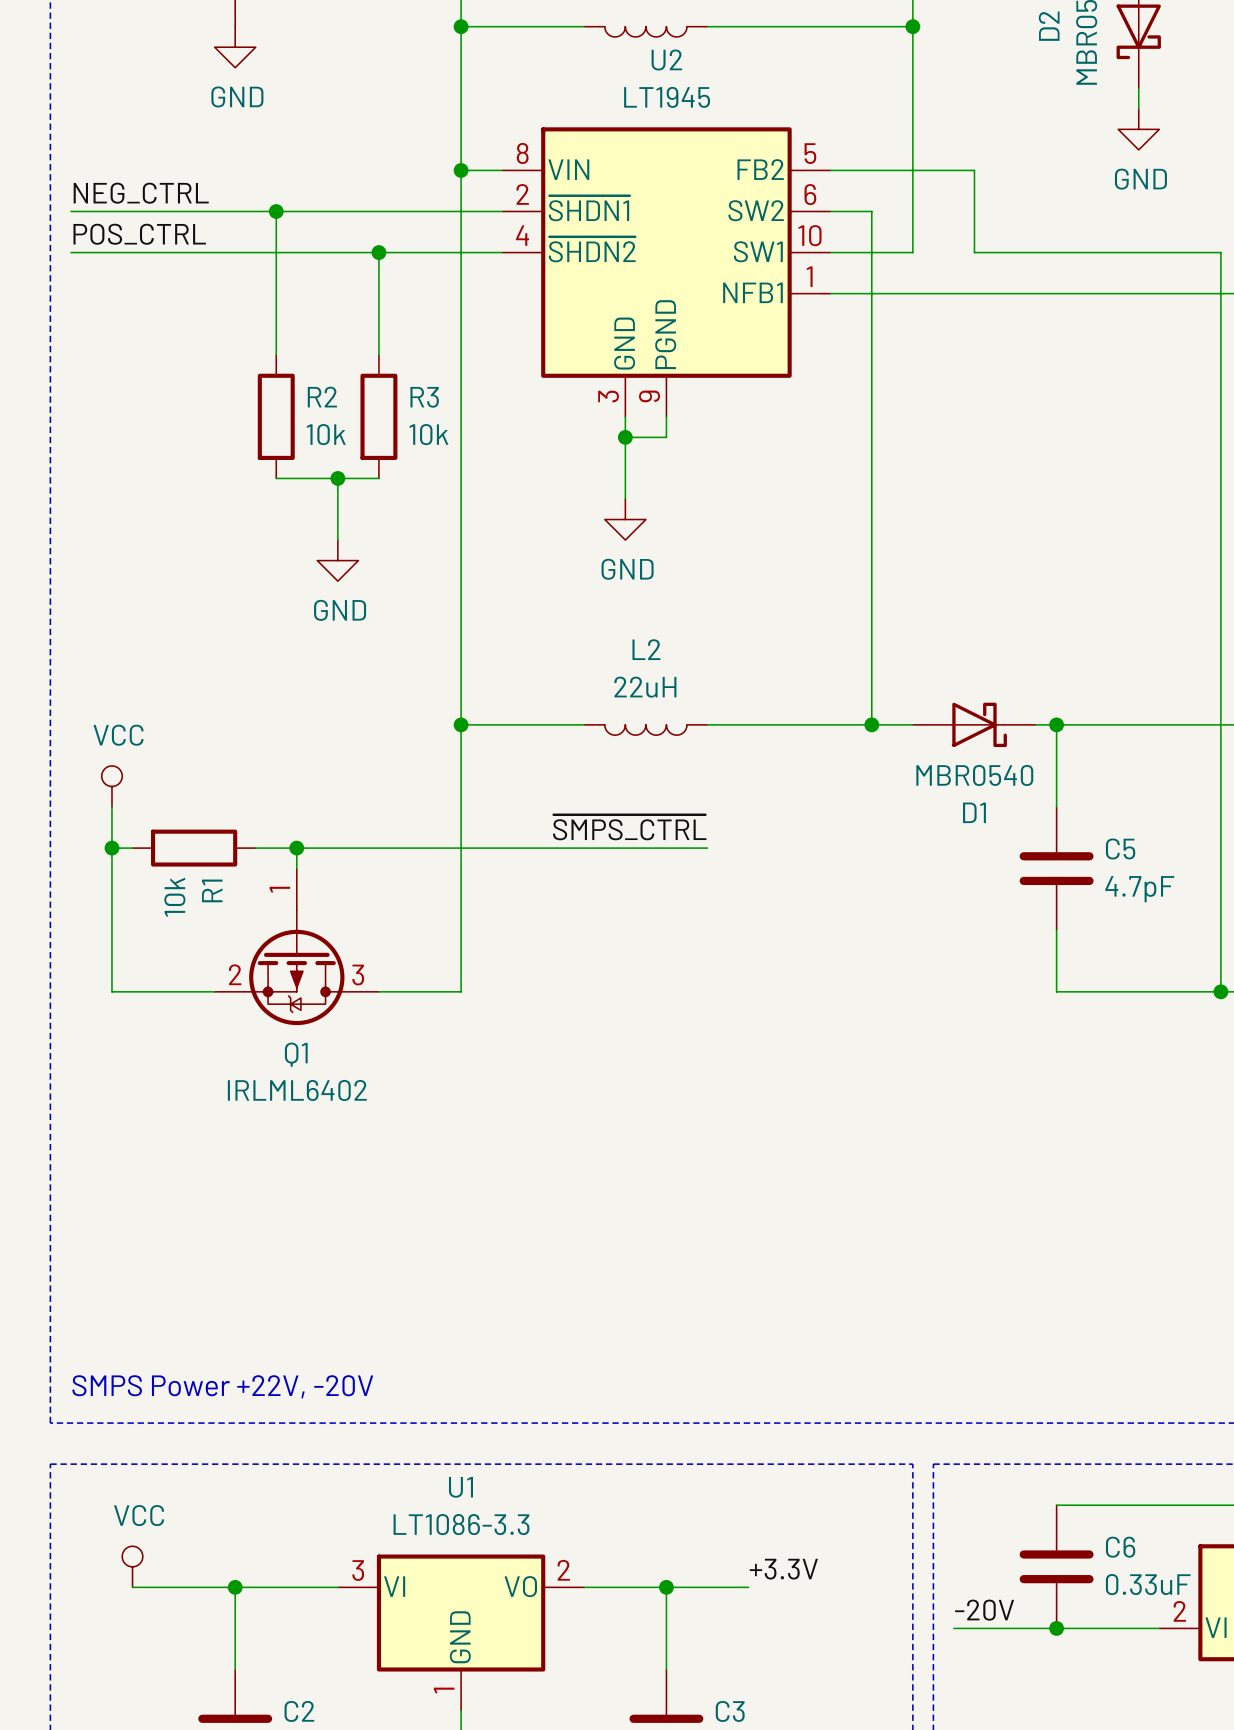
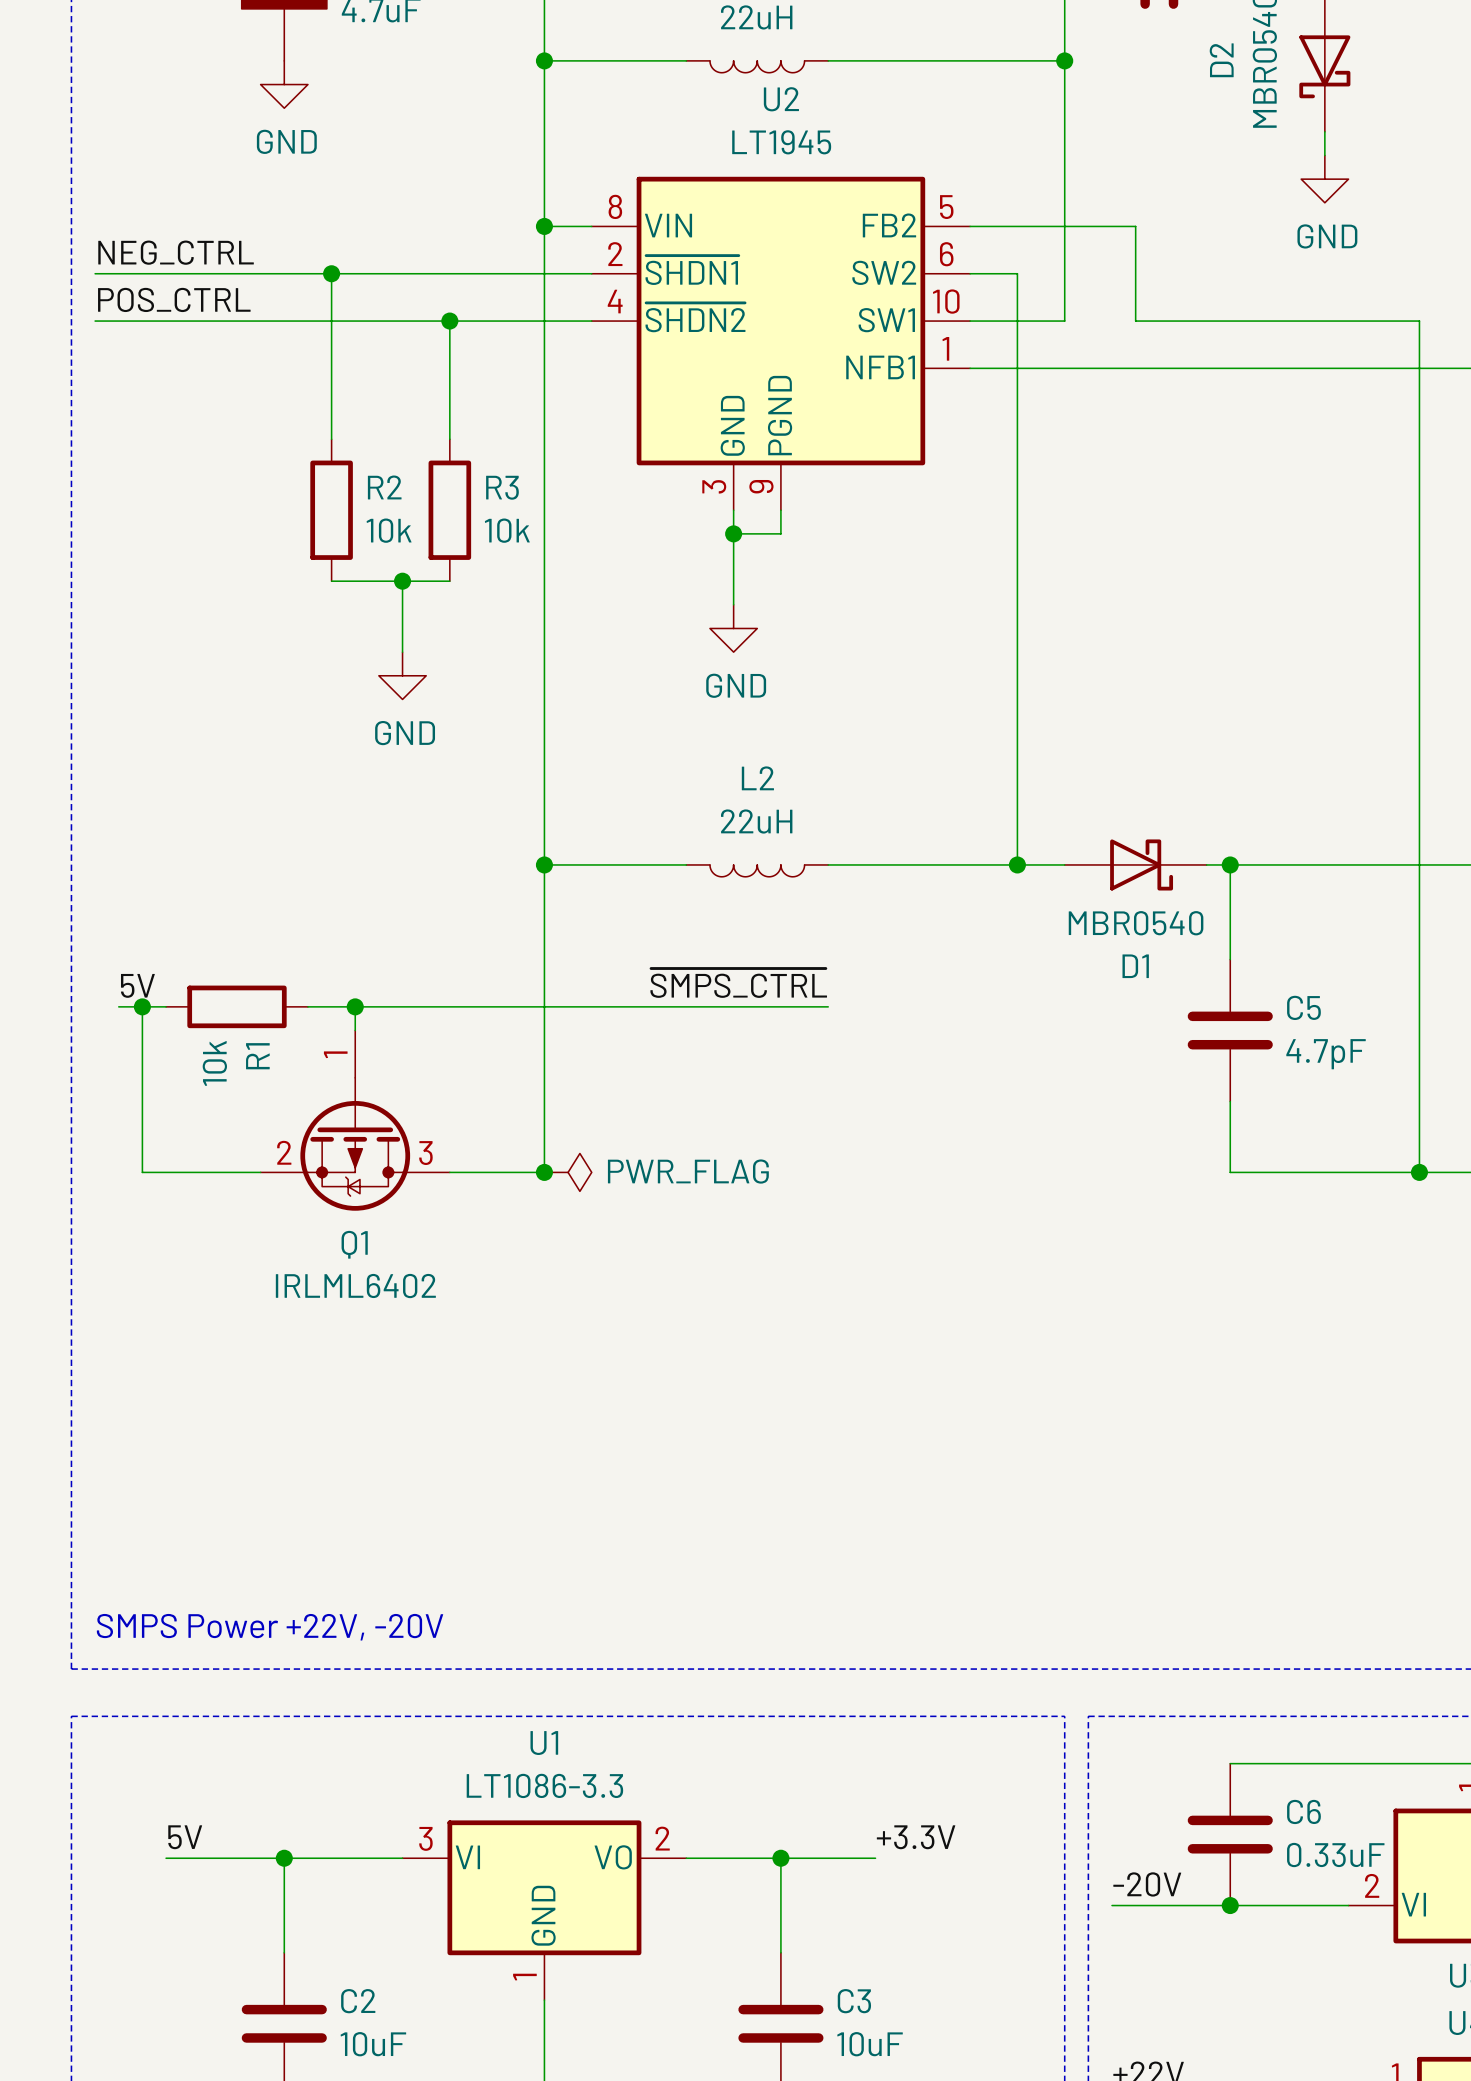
power symbol: VCC (111, 786) -> none
wire: (111, 807) (111, 848) -> (118, 1006) (142, 1006)
label: none -> 5V (137, 985)
junction: none -> (544, 1172)
power symbol: none -> PWR_FLAG (568, 1172)
power symbol: VCC (132, 1566) -> none
label: none -> 5V (185, 1837)

